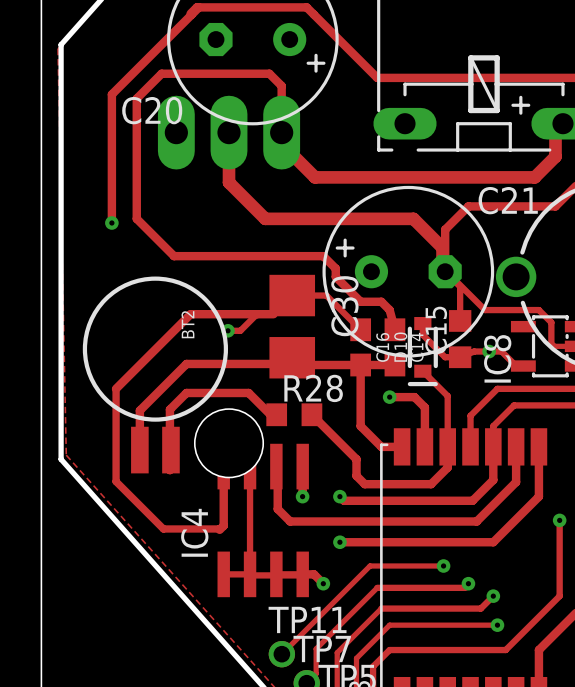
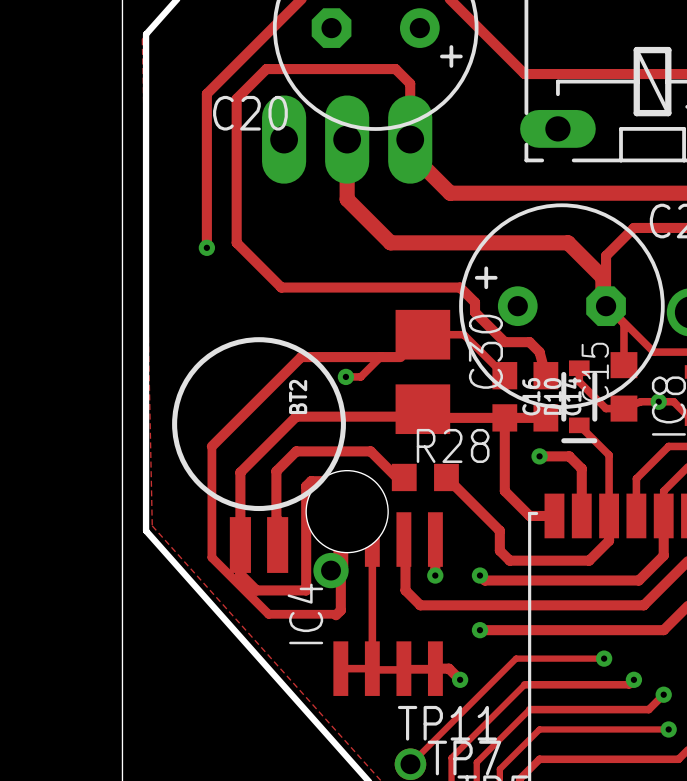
BT2 position: (155, 374) -> (259, 455)
track: none -> (240, 519) (240, 574) (256, 590) (306, 590) (306, 486) (311, 481) (355, 481) (370, 496) (370, 537) (372, 539)
via: none -> (331, 570)

